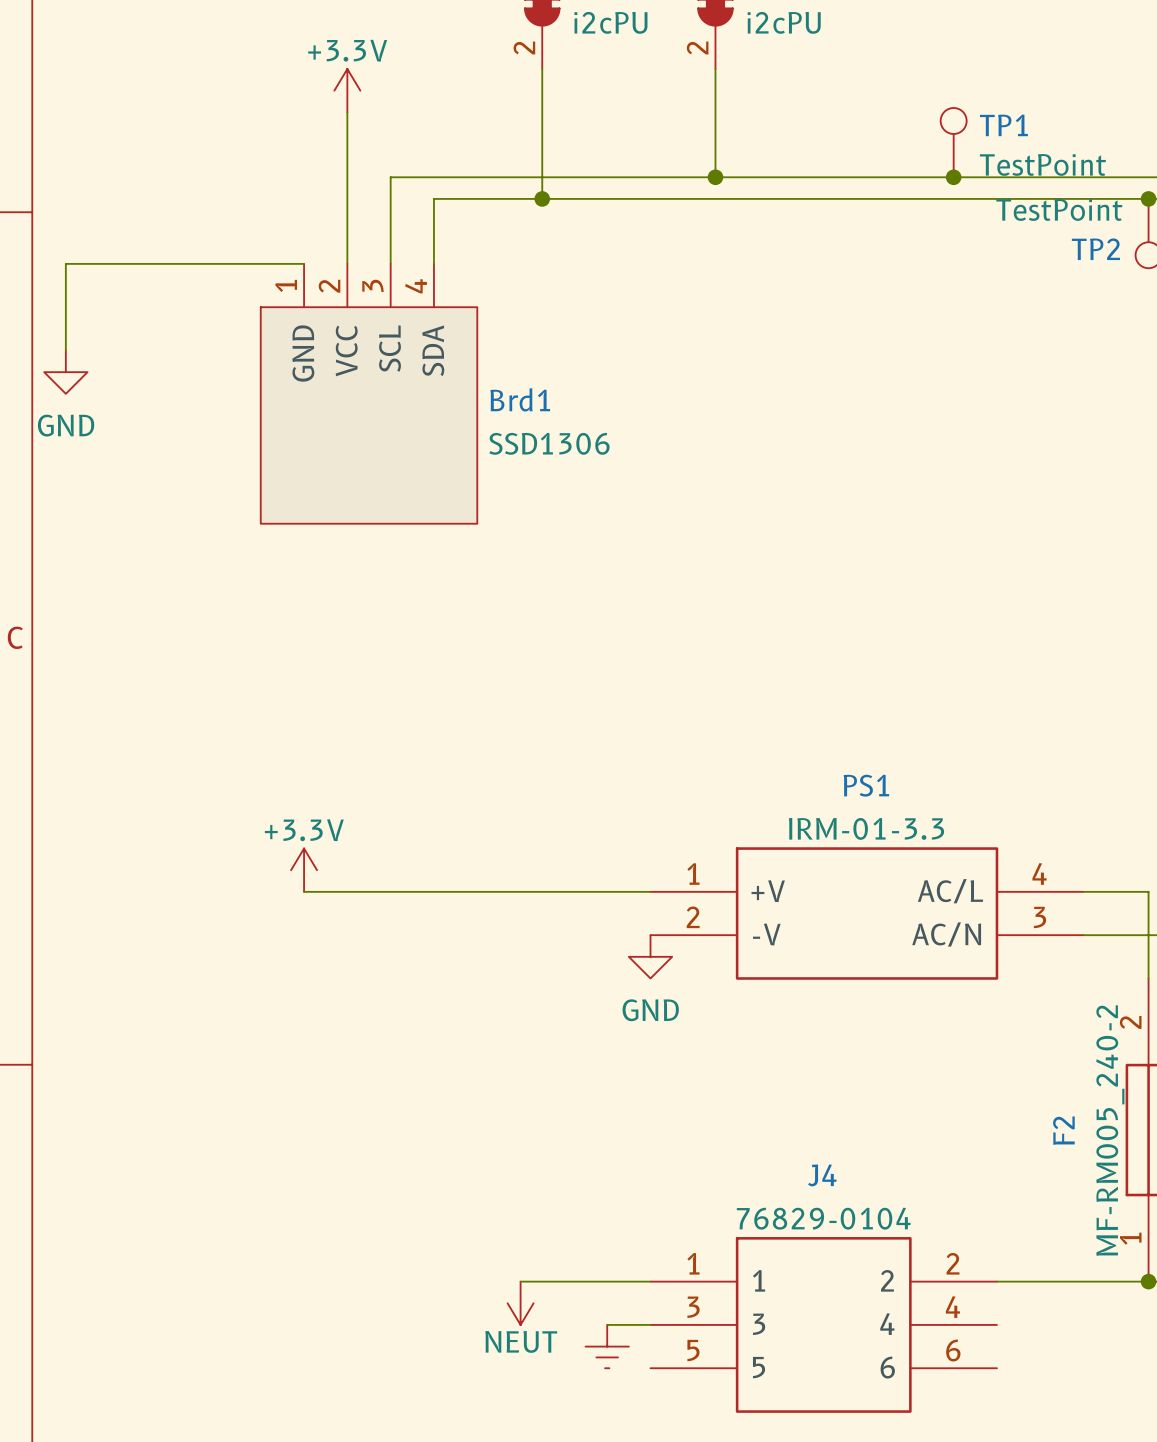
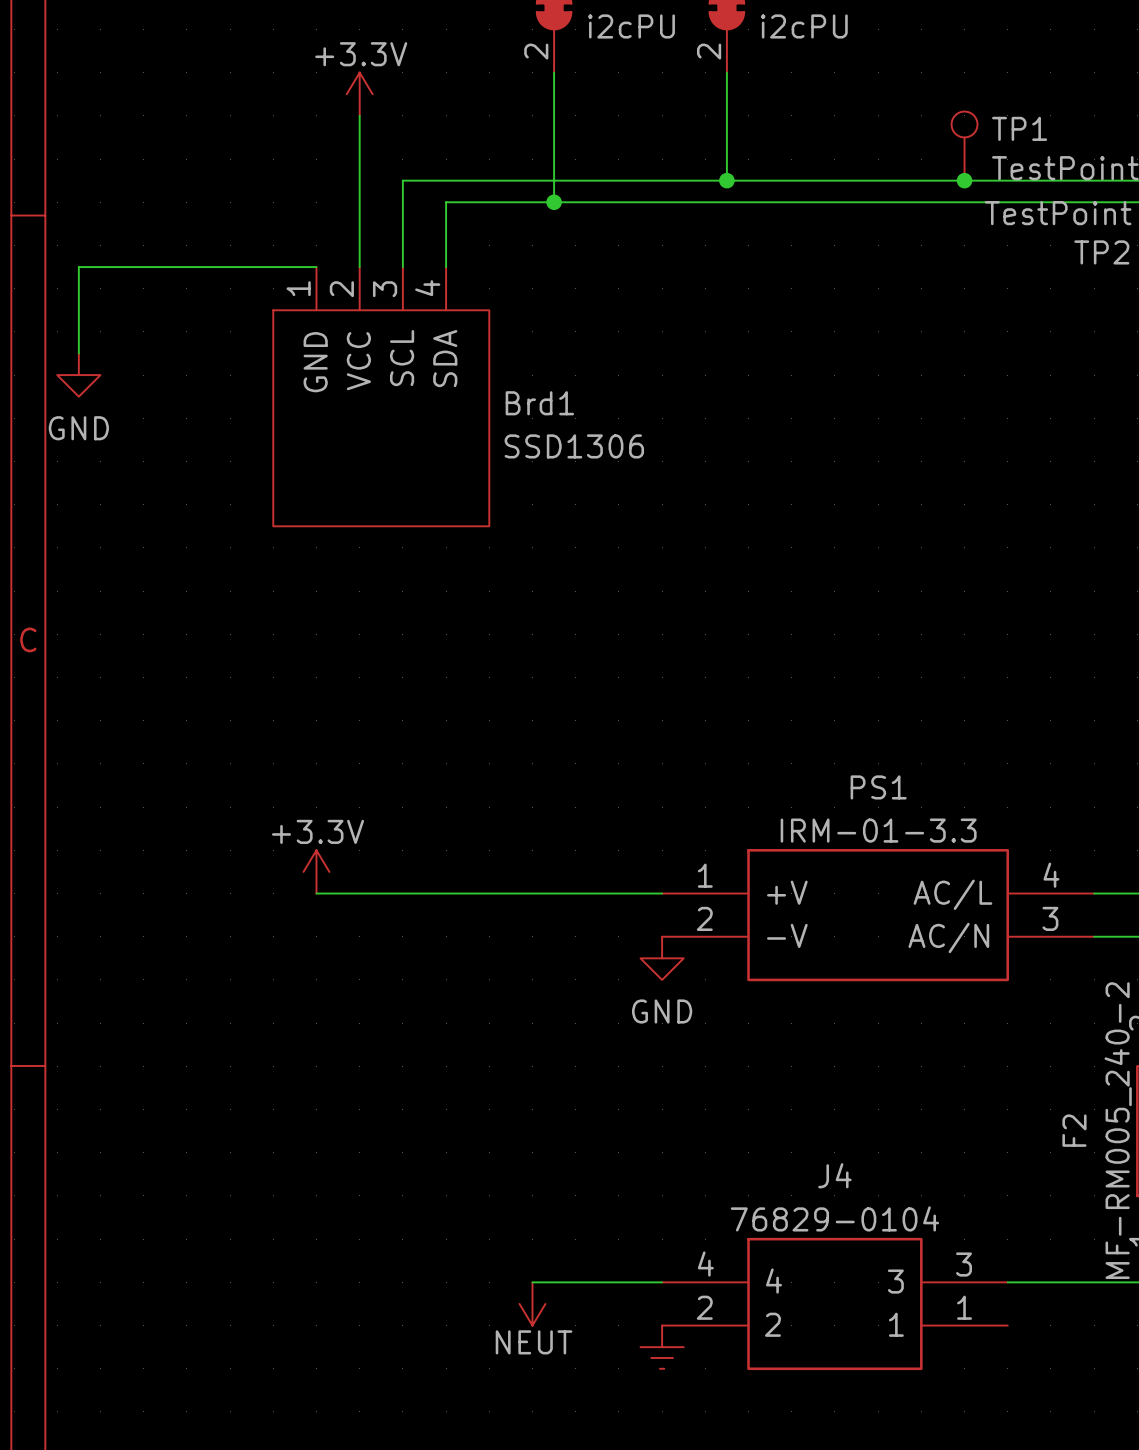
J4 symbol: [650, 1237, 997, 1413] -> [662, 1237, 1008, 1371]
wire: (607, 1324) (650, 1324) -> none
power symbol position: (607, 1346) -> (662, 1347)

